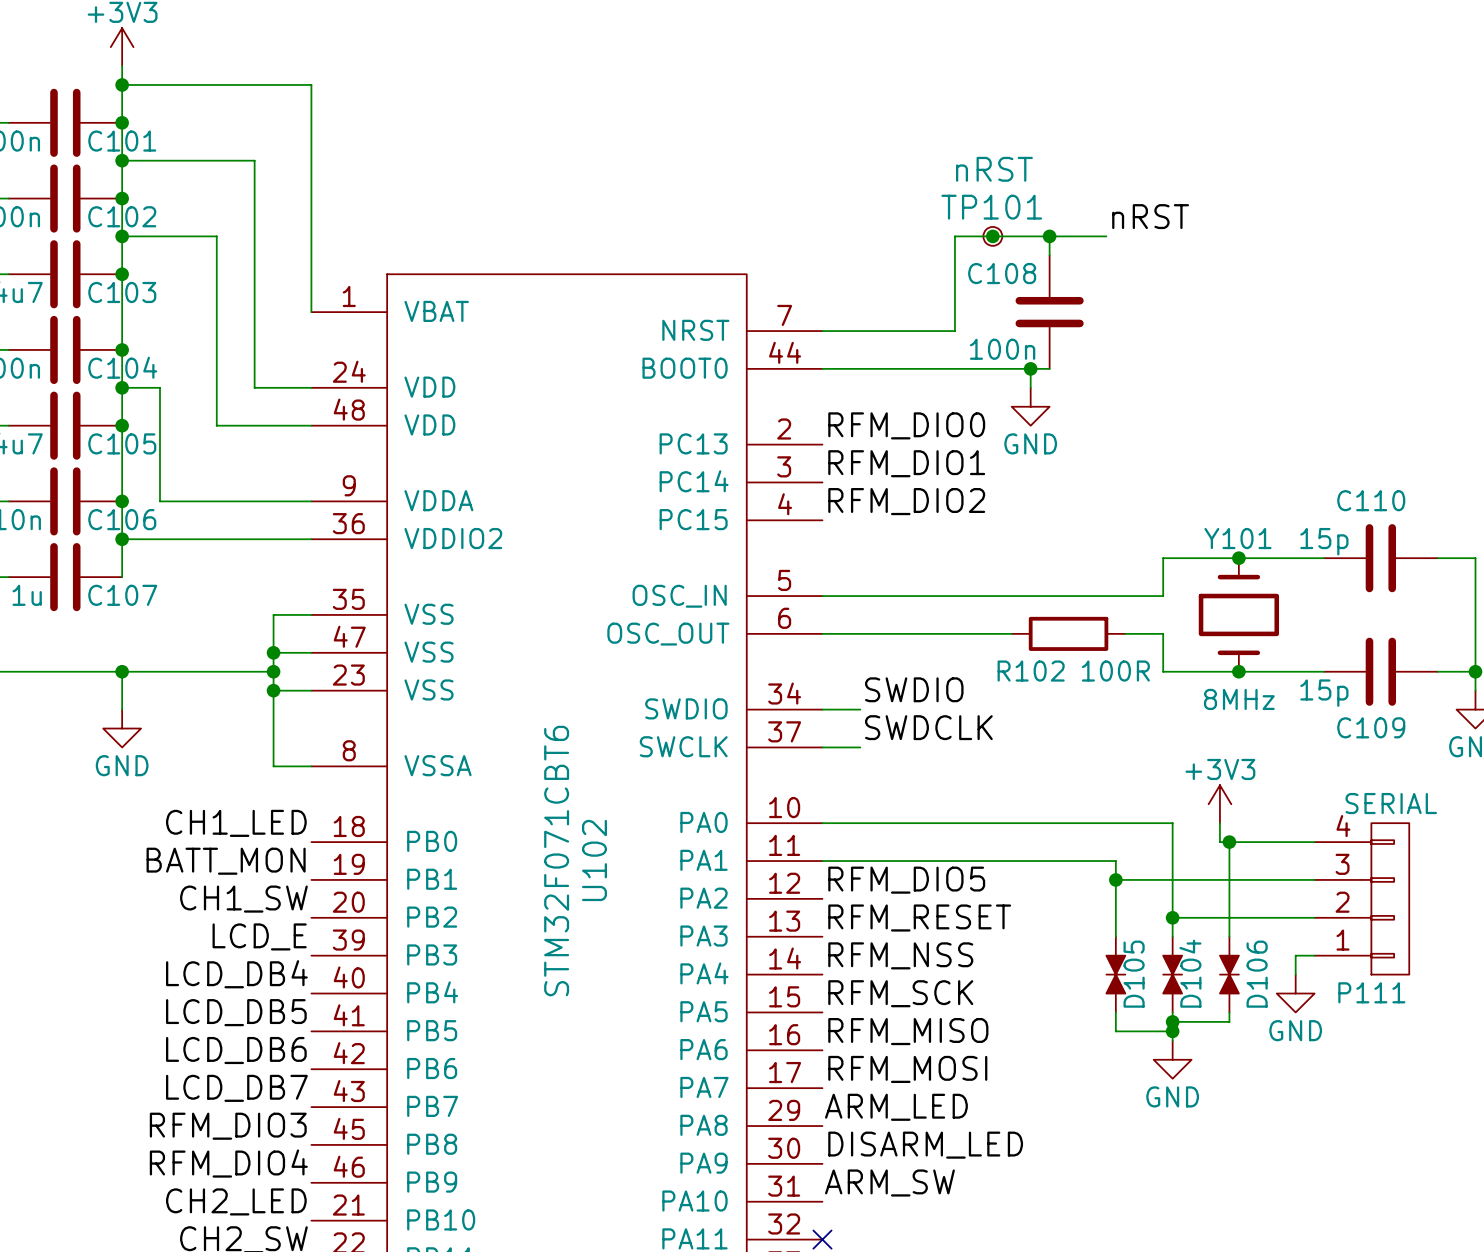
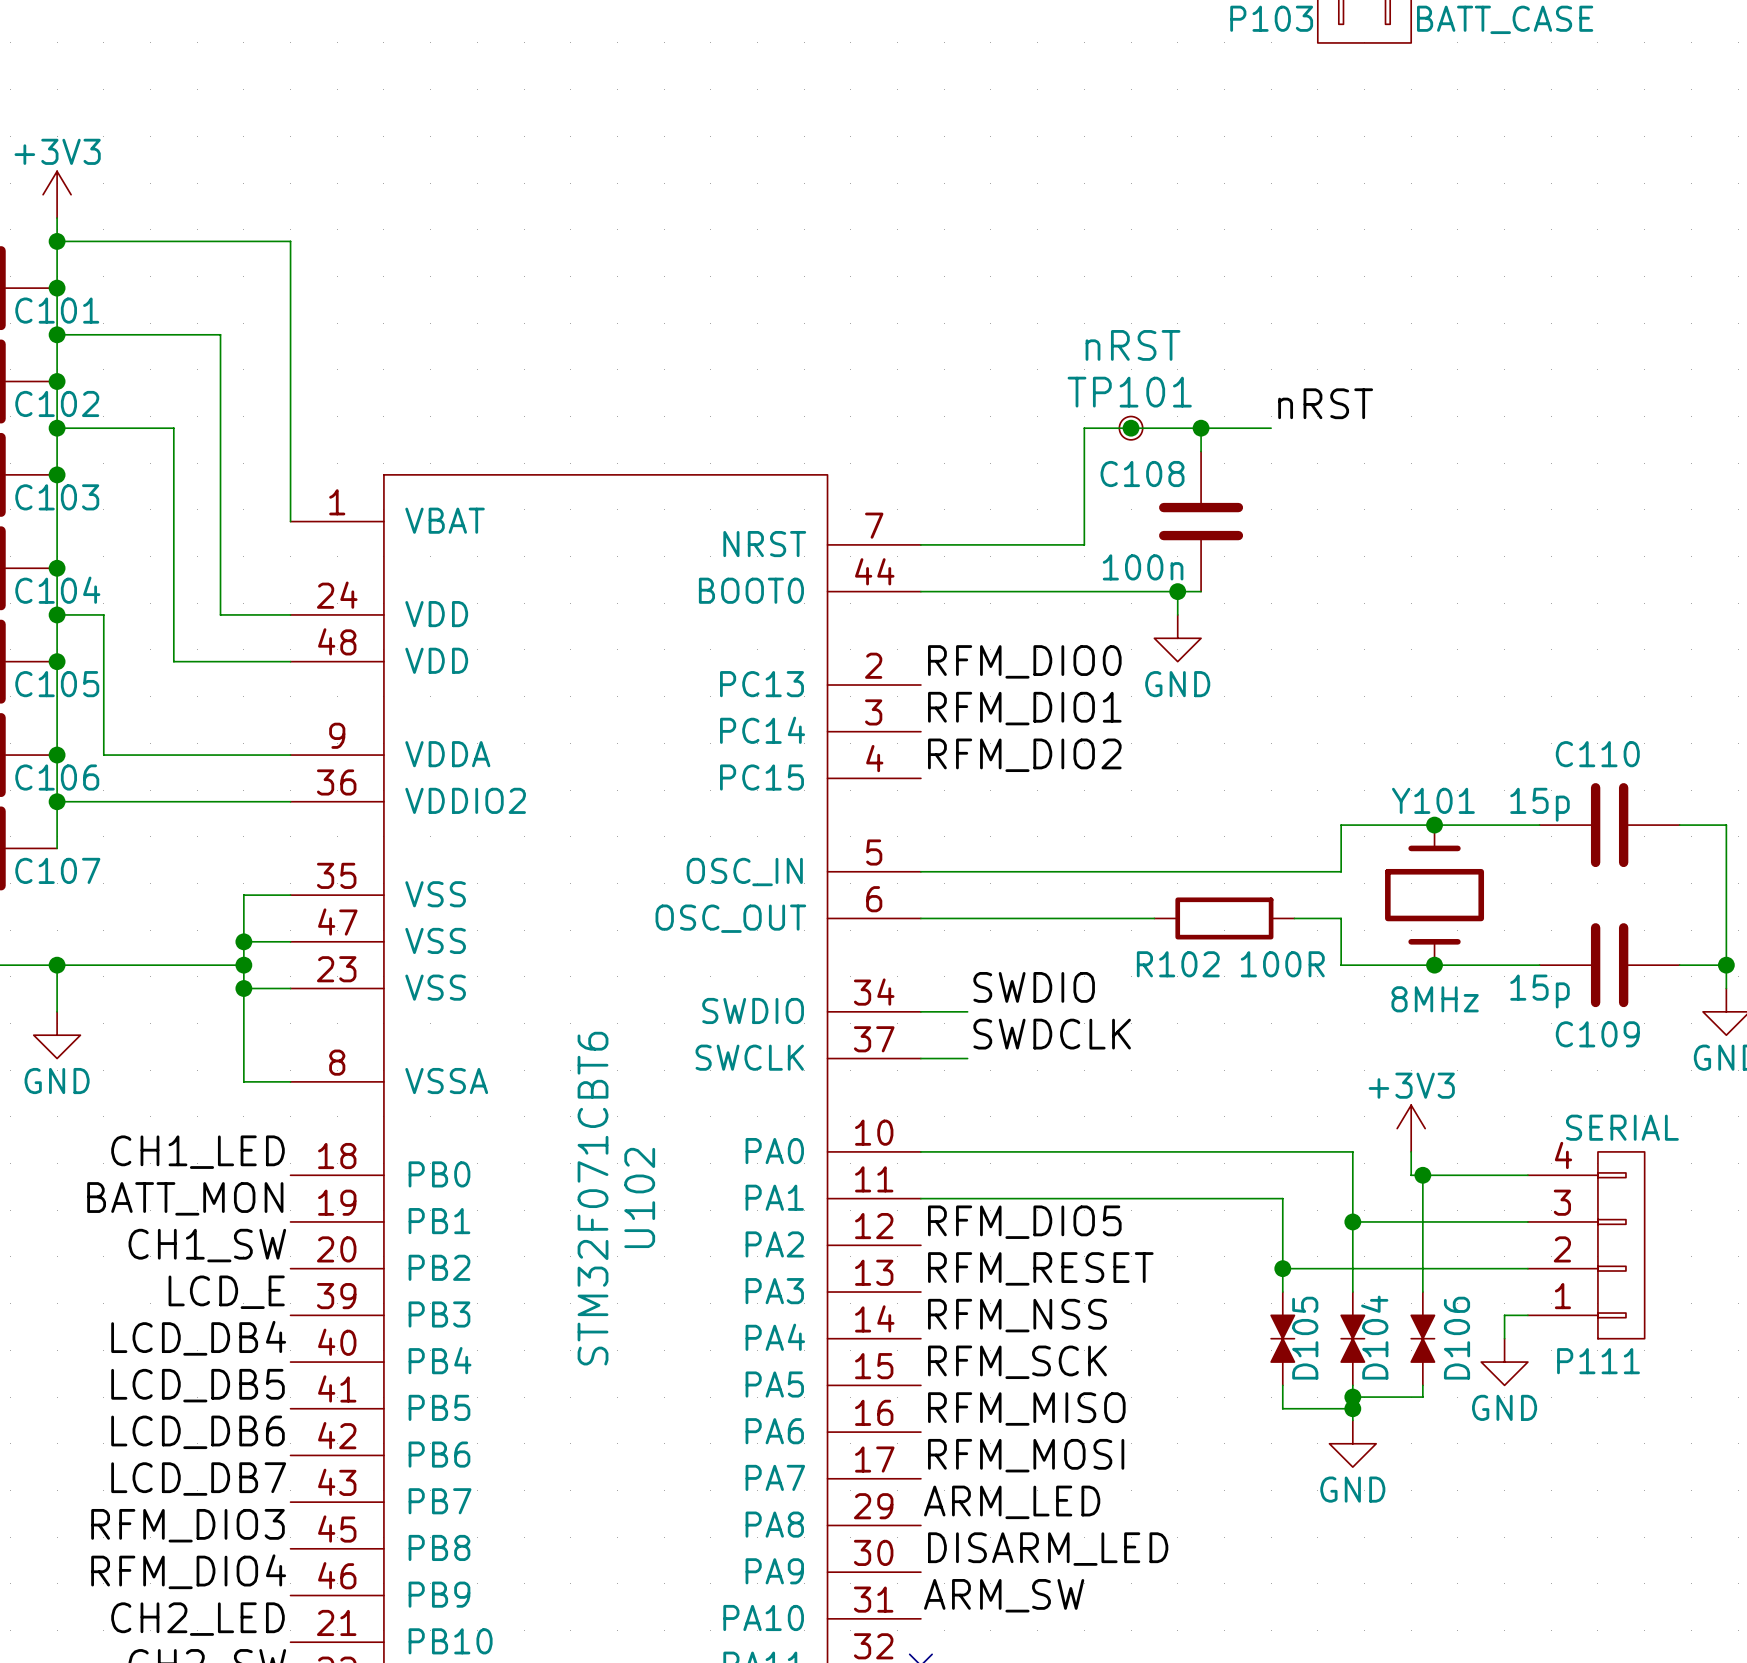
wire: (1115, 879) (1172, 879) -> (1282, 1268) (1352, 1268)
junction: (1115, 879) -> none
junction: none -> (1352, 1221)
junction: none -> (1282, 1268)
junction: (1172, 917) -> none

